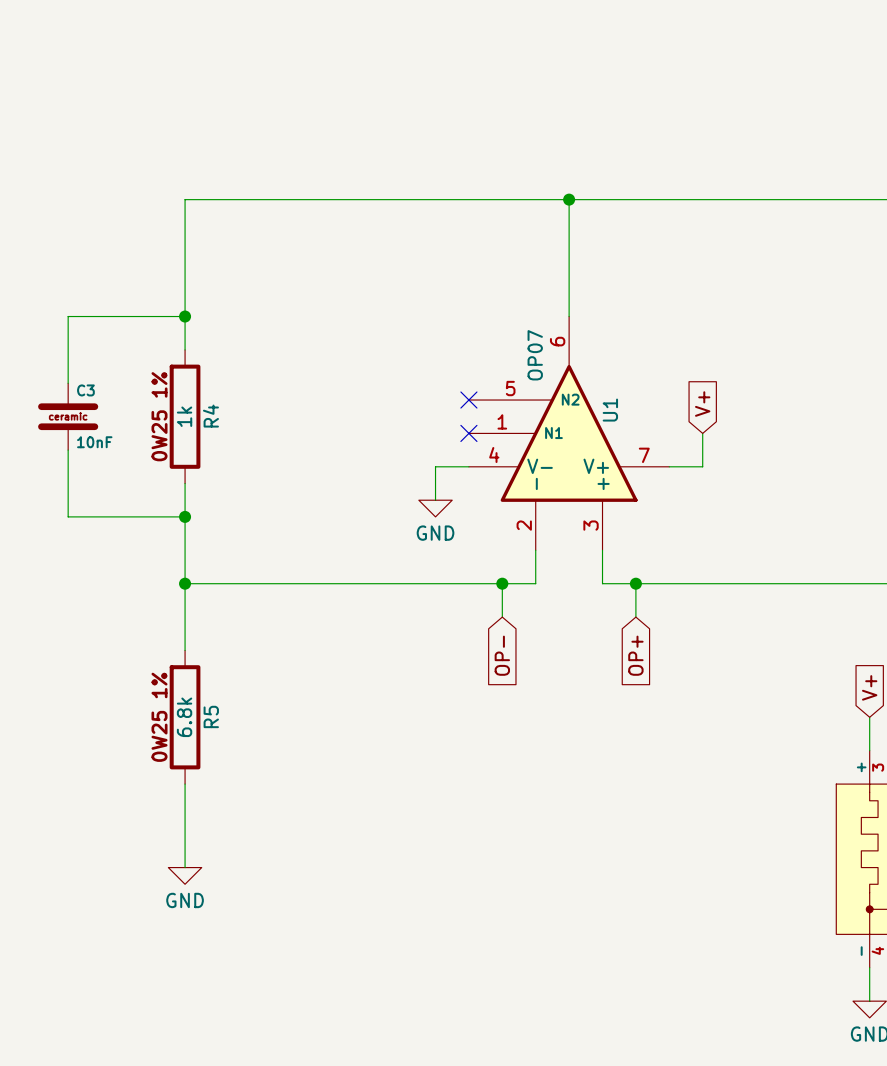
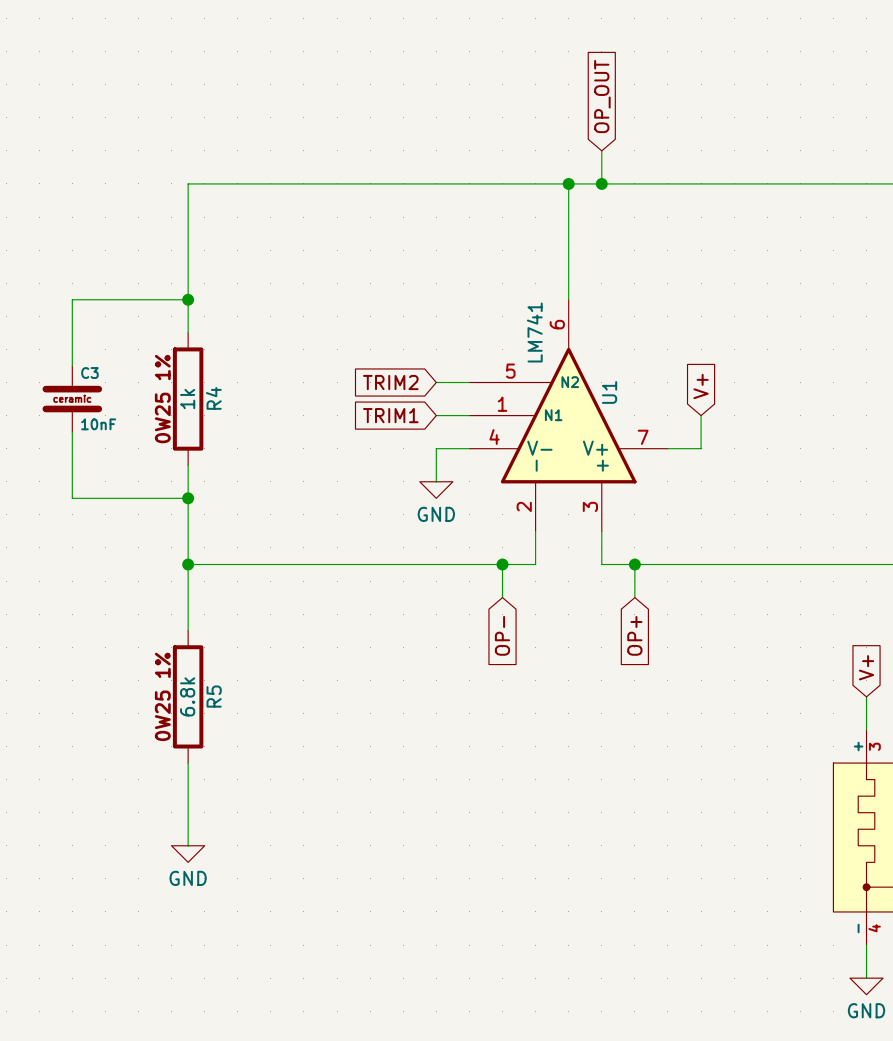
global label: none -> OP_OUT (602, 96)
wire: none -> (601, 150) (601, 183)
junction: none -> (601, 183)
U1 value: OP07 (535, 355) -> LM741 (534, 332)
global label: none -> TRIM2 (390, 382)
wire: none -> (436, 382) (469, 382)
no-connect mark: (468, 400) -> none
global label: none -> TRIM1 (390, 415)
wire: none -> (436, 415) (469, 415)
no-connect mark: (468, 433) -> none

